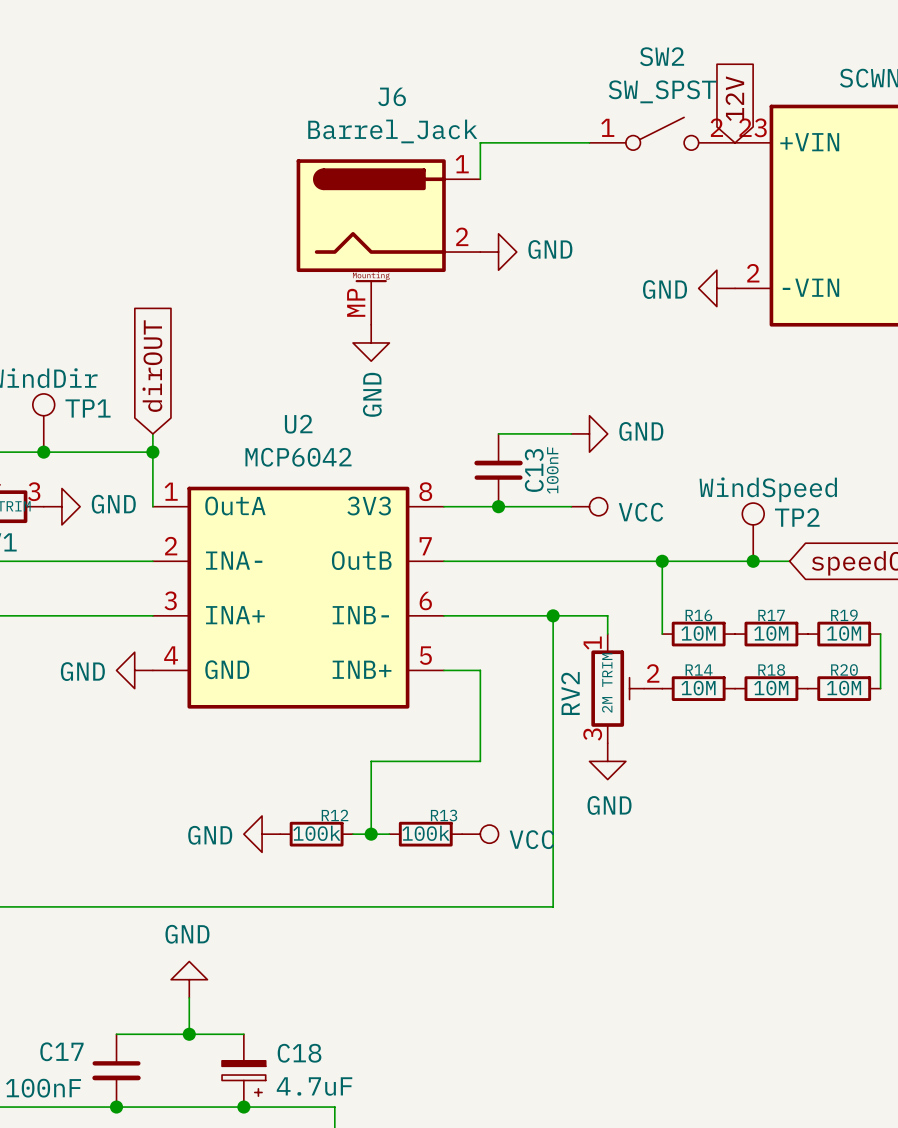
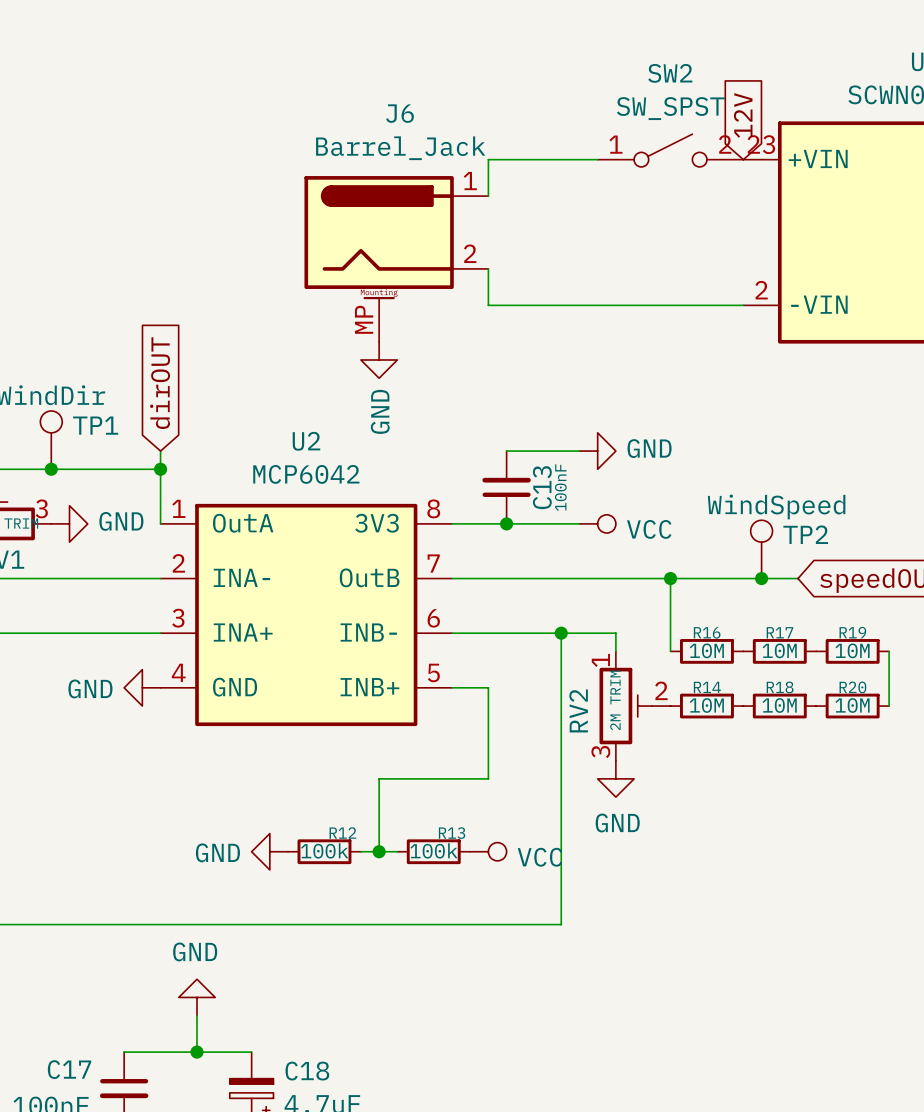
wire: none -> (488, 268) (488, 305) (743, 305)
power symbol: GND (498, 252) -> none
power symbol: GND (716, 288) -> none

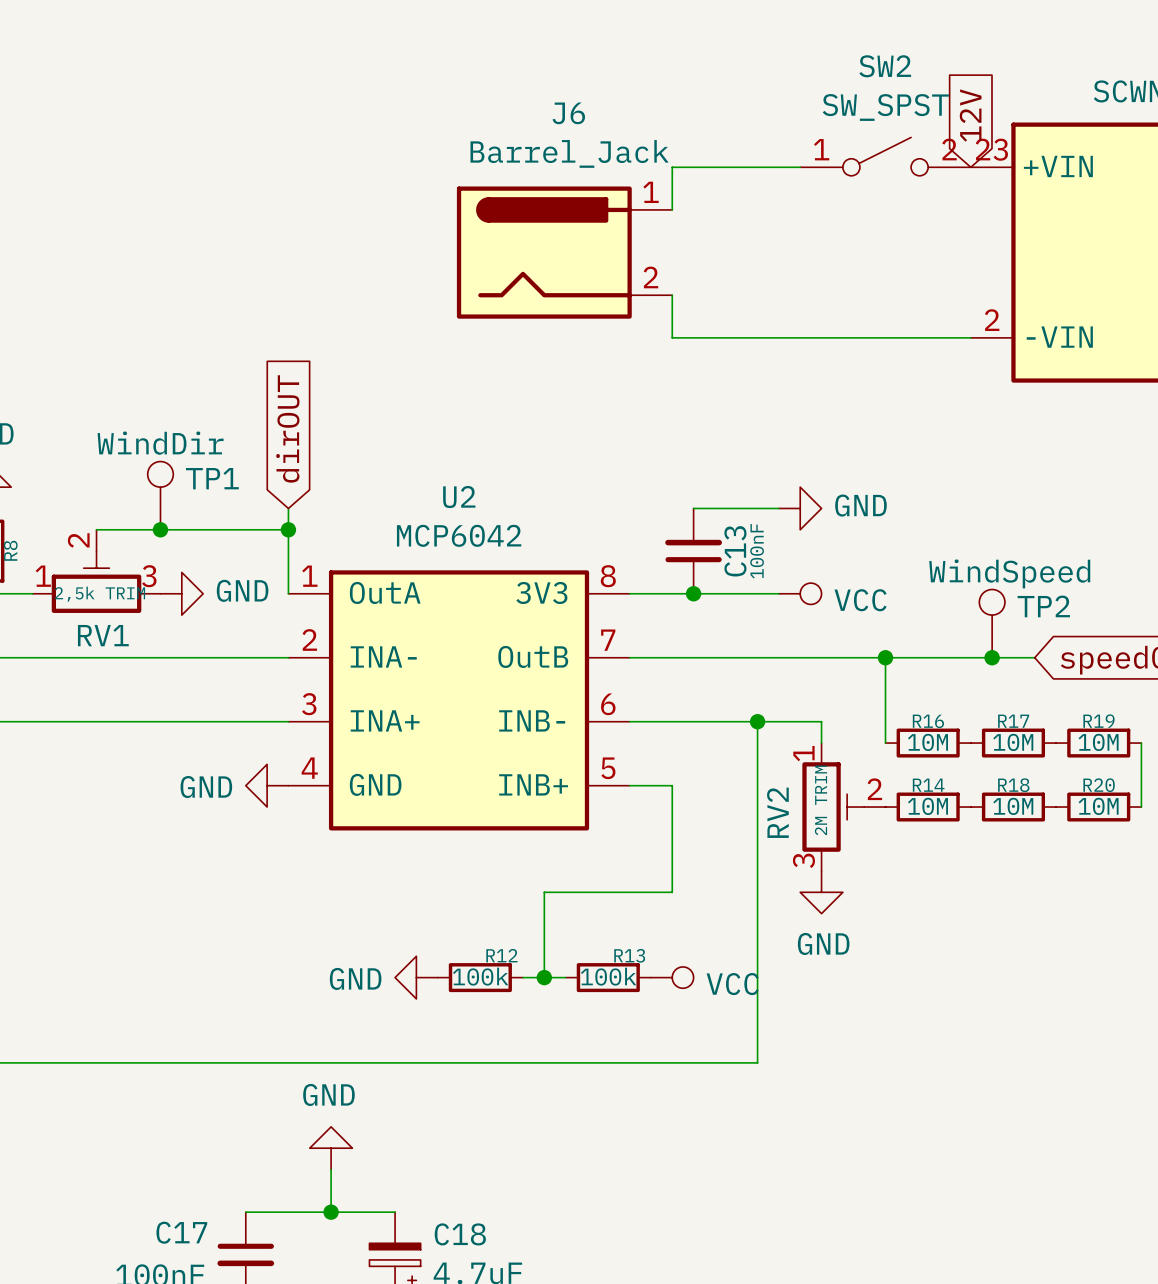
J6 symbol: [304, 176, 489, 342] -> [456, 186, 673, 319]
power symbol: GND (379, 360) -> none

